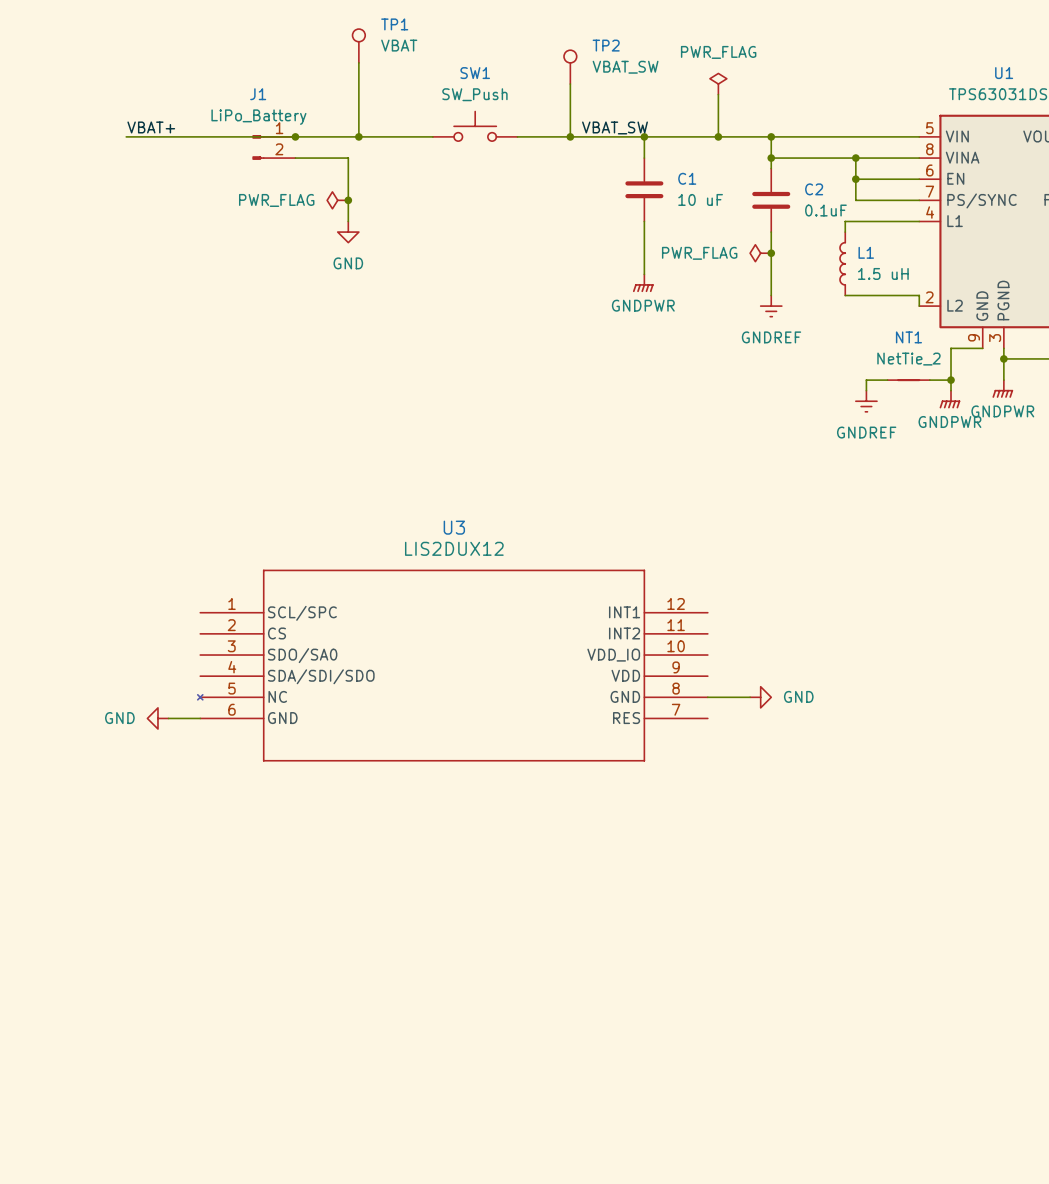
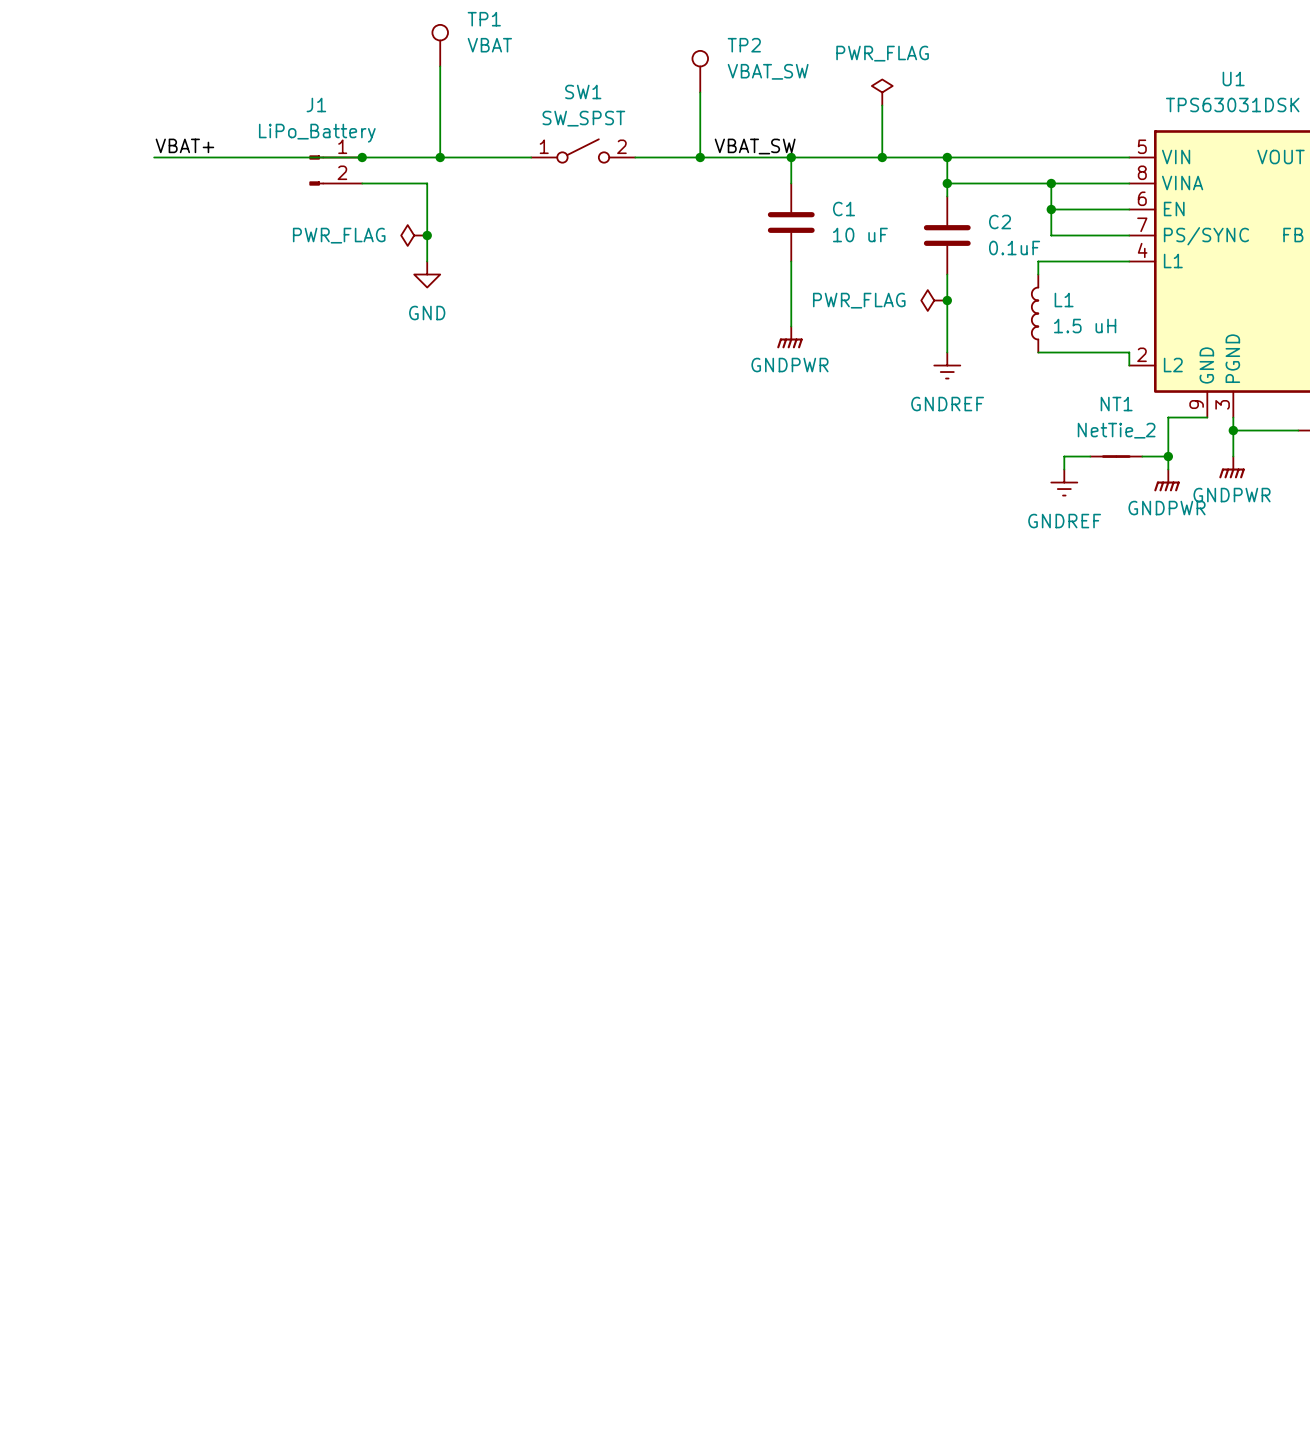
SW1 value: SW_Push (474, 94) -> SW_SPST (583, 118)
SW1 symbol: [432, 111, 518, 142] -> [531, 139, 636, 163]
U3: LIS2DUX12 (452, 665) -> none
wire: (707, 697) (750, 697) -> none
power symbol: GND (760, 697) -> none
power symbol: GND (157, 718) -> none
wire: (168, 718) (200, 718) -> none

